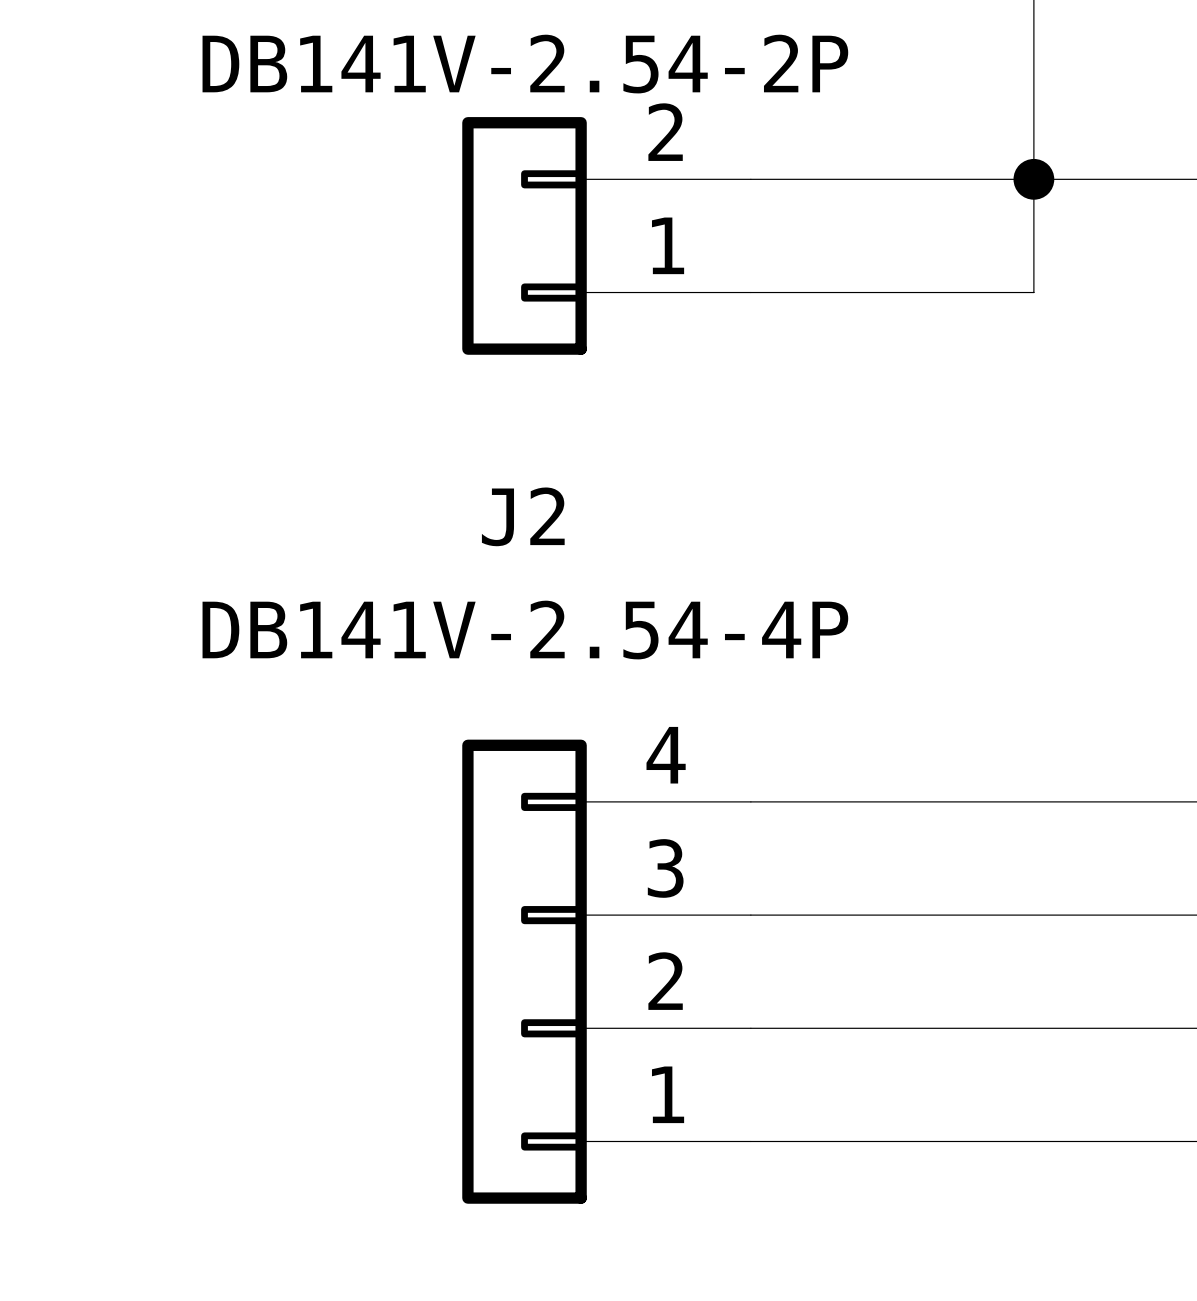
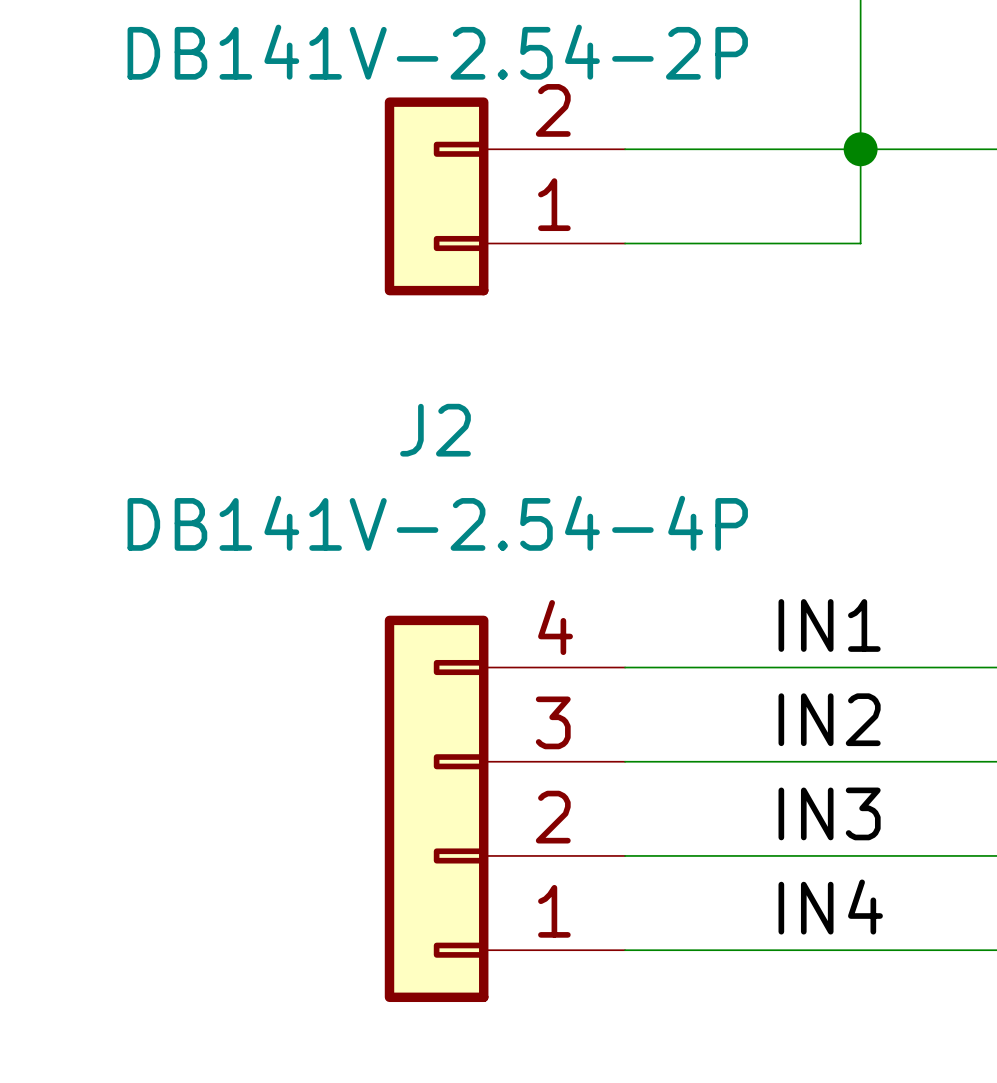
label: none -> IN1 (829, 625)
label: none -> IN2 (829, 719)
label: none -> IN3 (829, 813)
label: none -> IN4 (830, 907)

